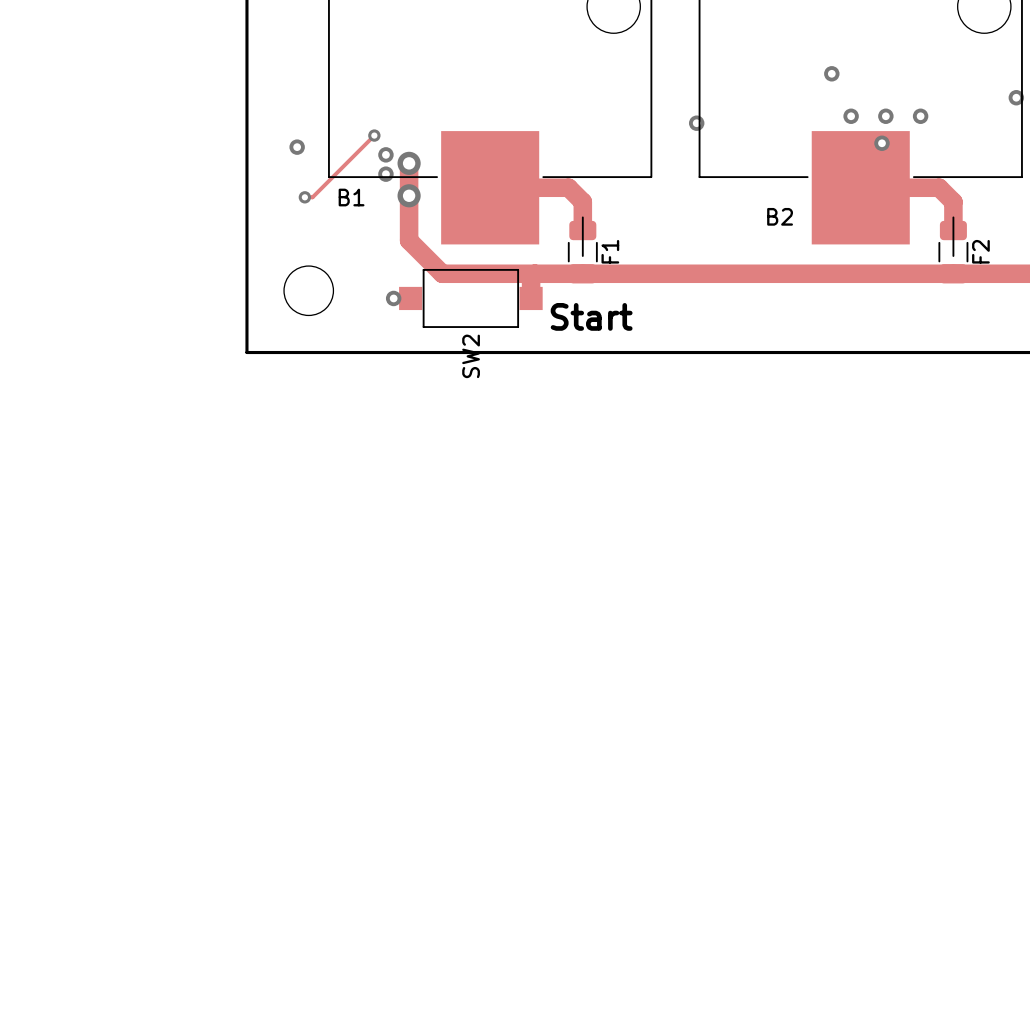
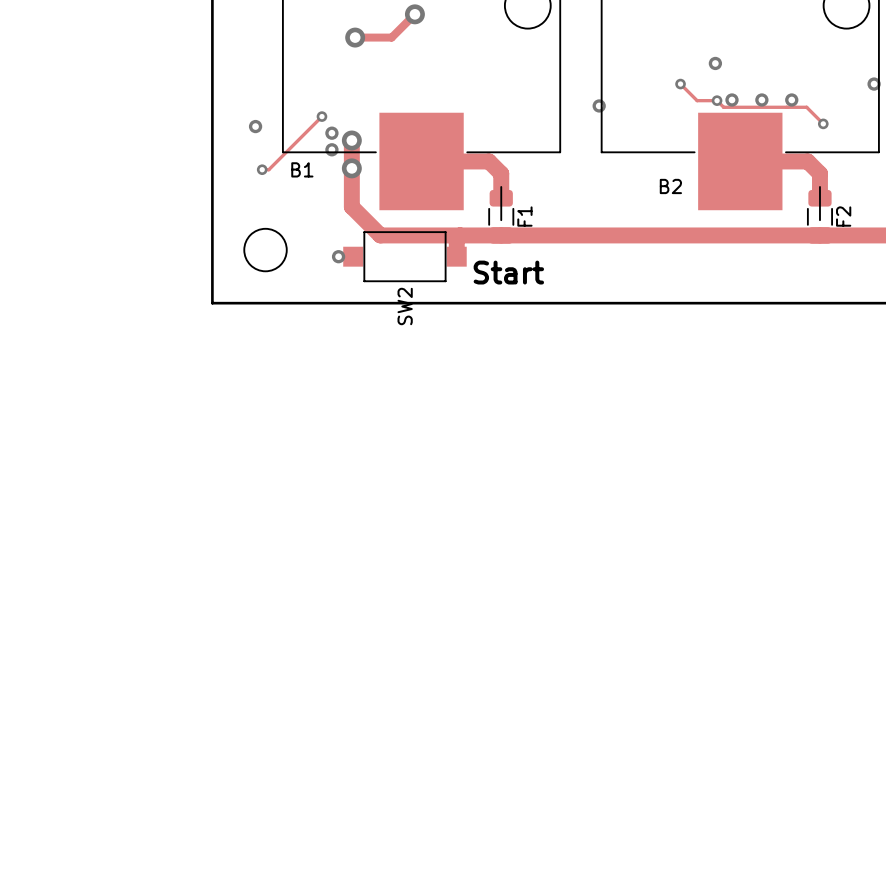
track: none -> (414, 14) (391, 37) (355, 37)
via: none -> (414, 14)
via: none -> (355, 37)
track: none -> (680, 84) (697, 100) (717, 100) (723, 107) (806, 107) (823, 123)
via: none -> (680, 84)
via: none -> (717, 100)
via: (881, 143) -> none
via: none -> (823, 123)

